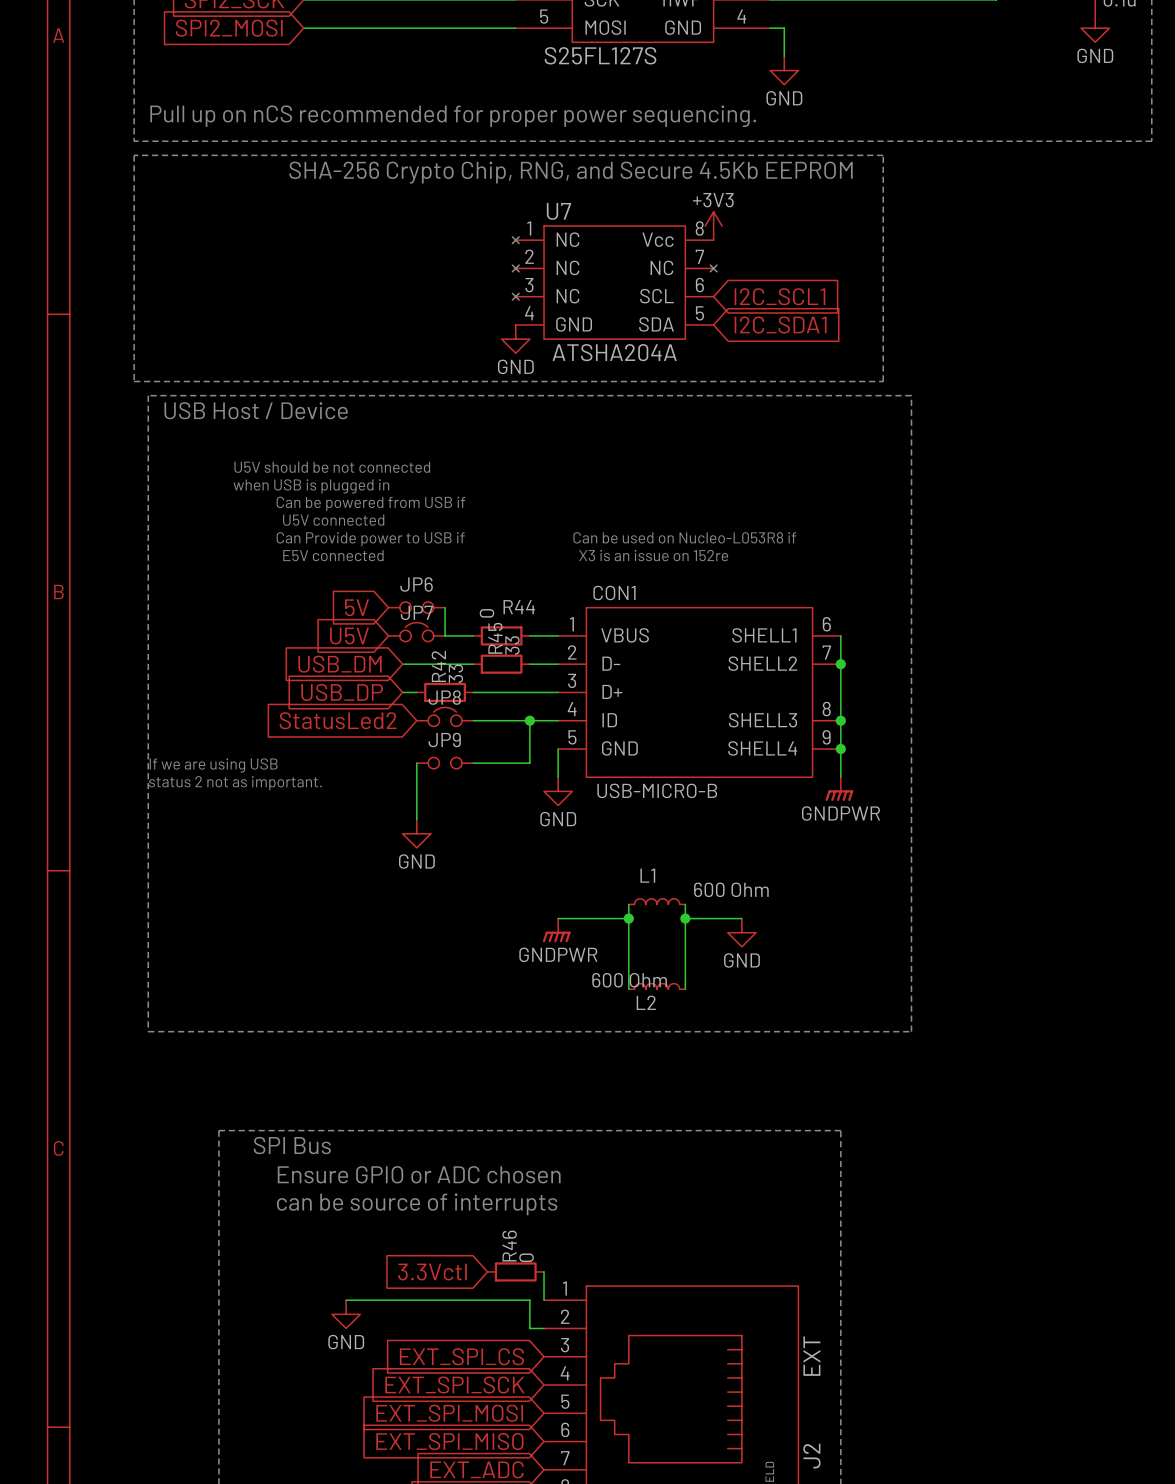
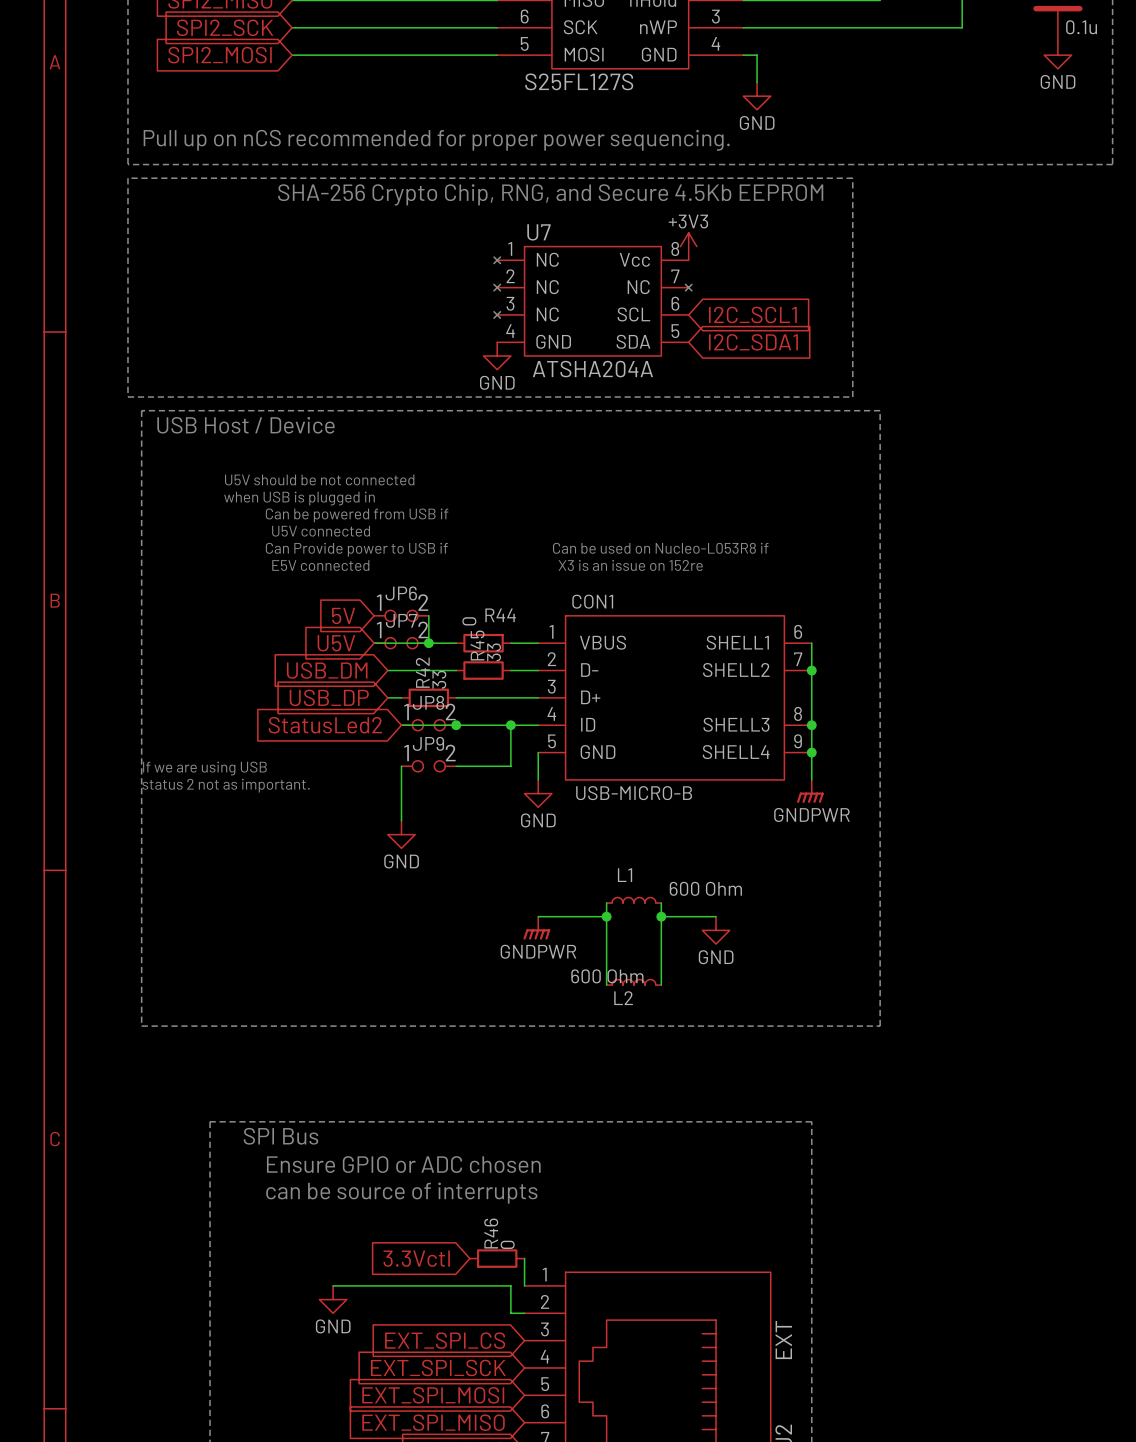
JP6 pin number: none -> 2 (423, 602)
JP6 pin number: none -> 1 (379, 602)
JP7 symbol: [388, 622, 446, 642] -> [374, 637, 429, 649]
wire: none -> (374, 643) (428, 643)
junction: none -> (428, 643)
JP8 symbol: [416, 707, 474, 727] -> [401, 719, 457, 731]
wire: none -> (401, 725) (456, 725)
junction: none -> (456, 725)
JP9 pin number: none -> 1 (406, 753)
JP9 pin number: none -> 2 (450, 753)

